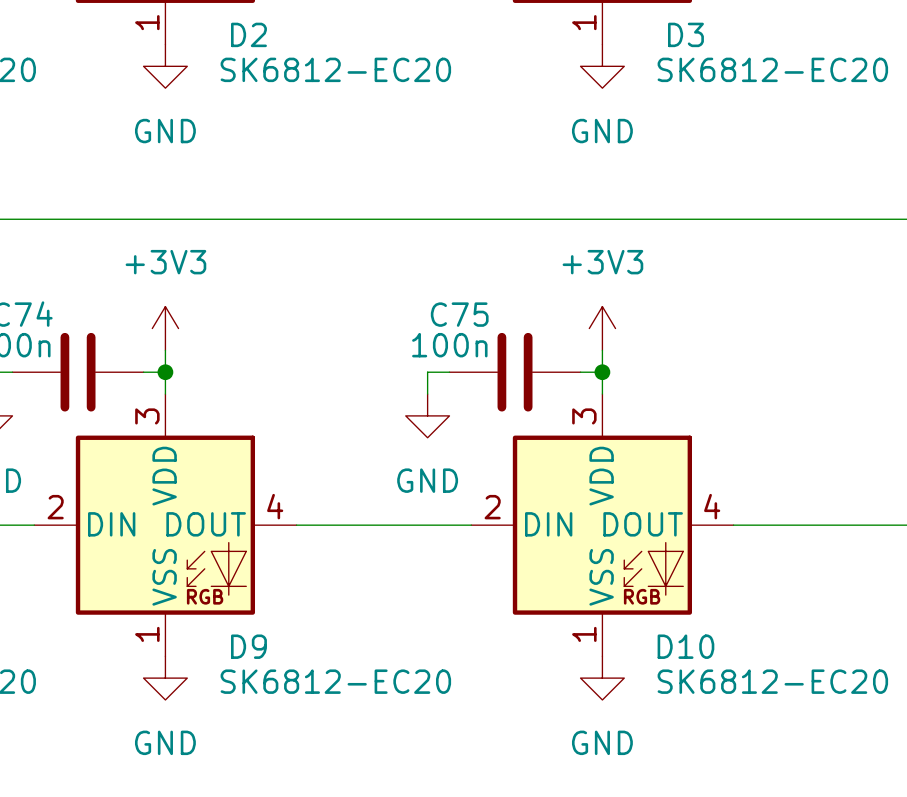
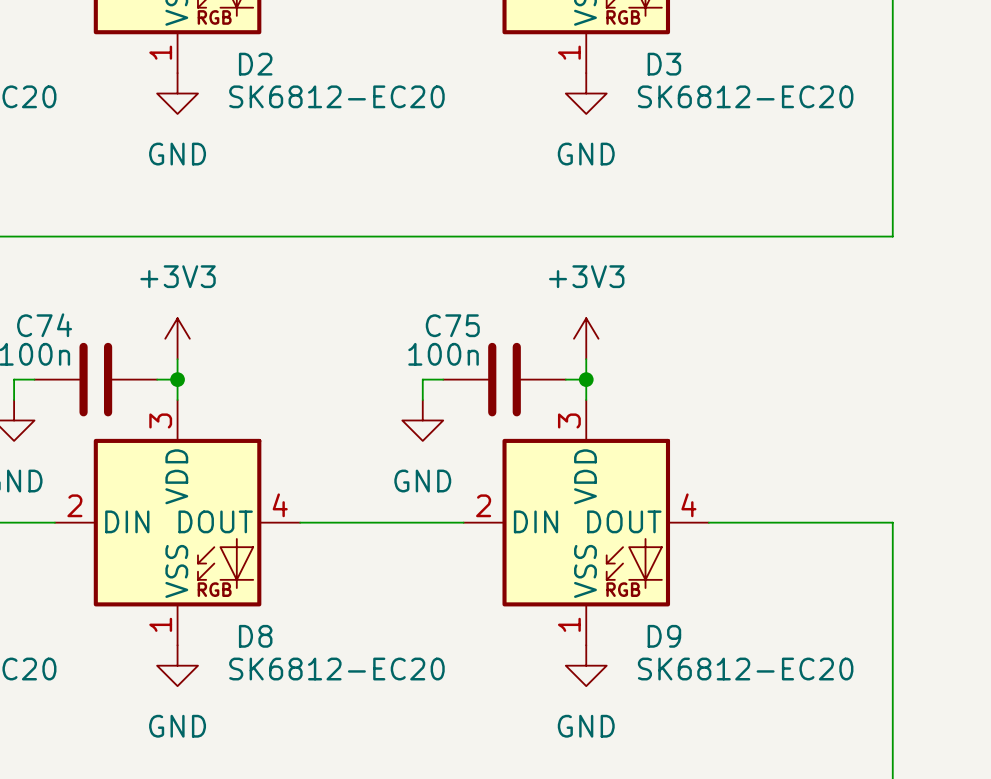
D9 name: D9 (248, 646) -> D8 (255, 636)
D10 name: D10 (685, 646) -> D9 (664, 636)

